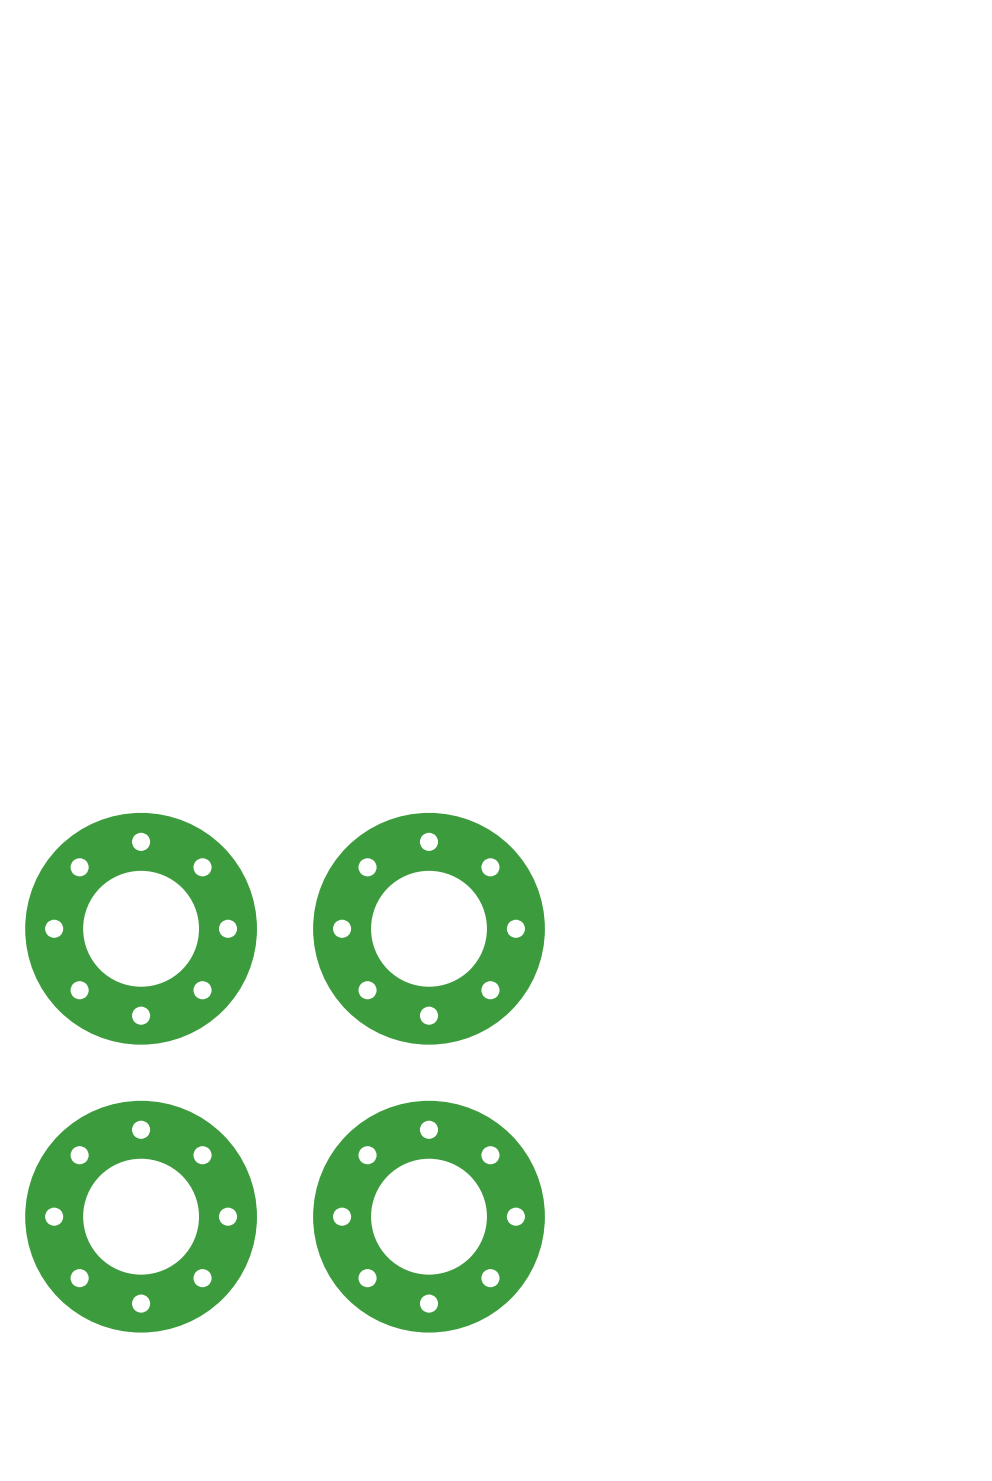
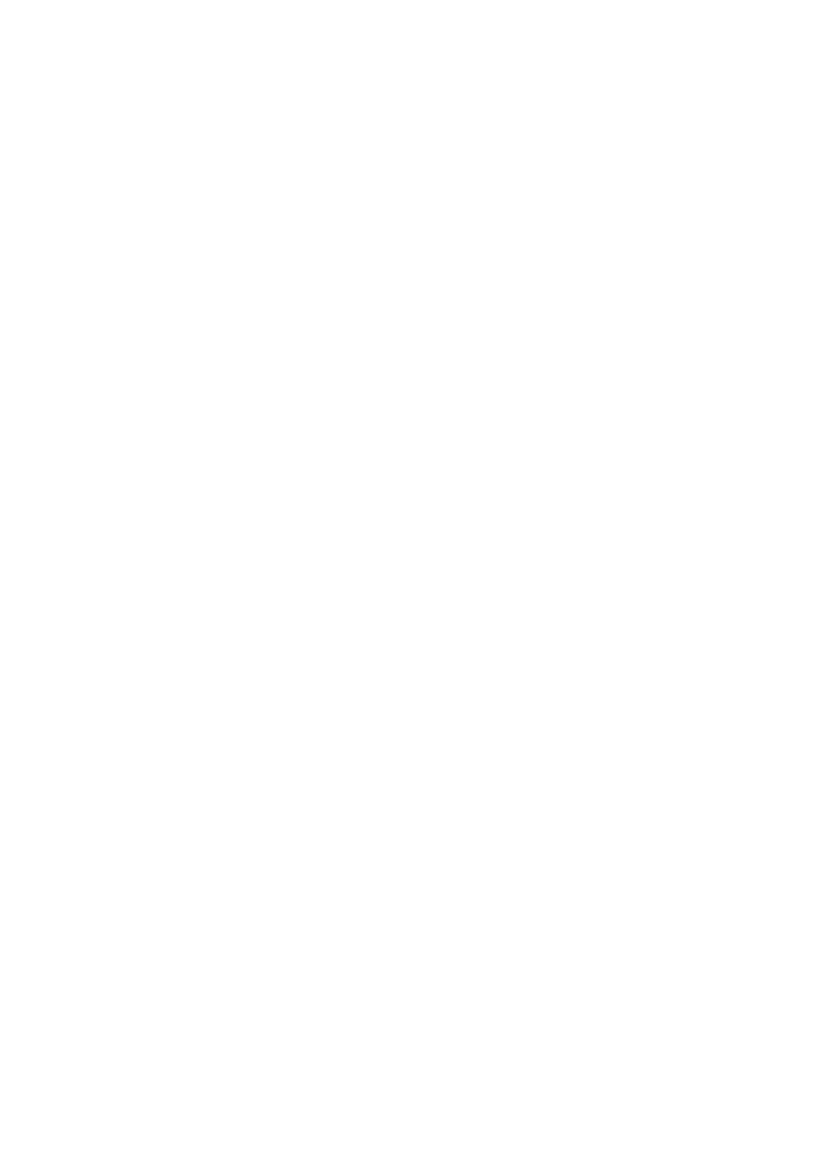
part: (141, 928) -> none
part: (428, 928) -> none
part: (141, 1216) -> none
part: (428, 1216) -> none

